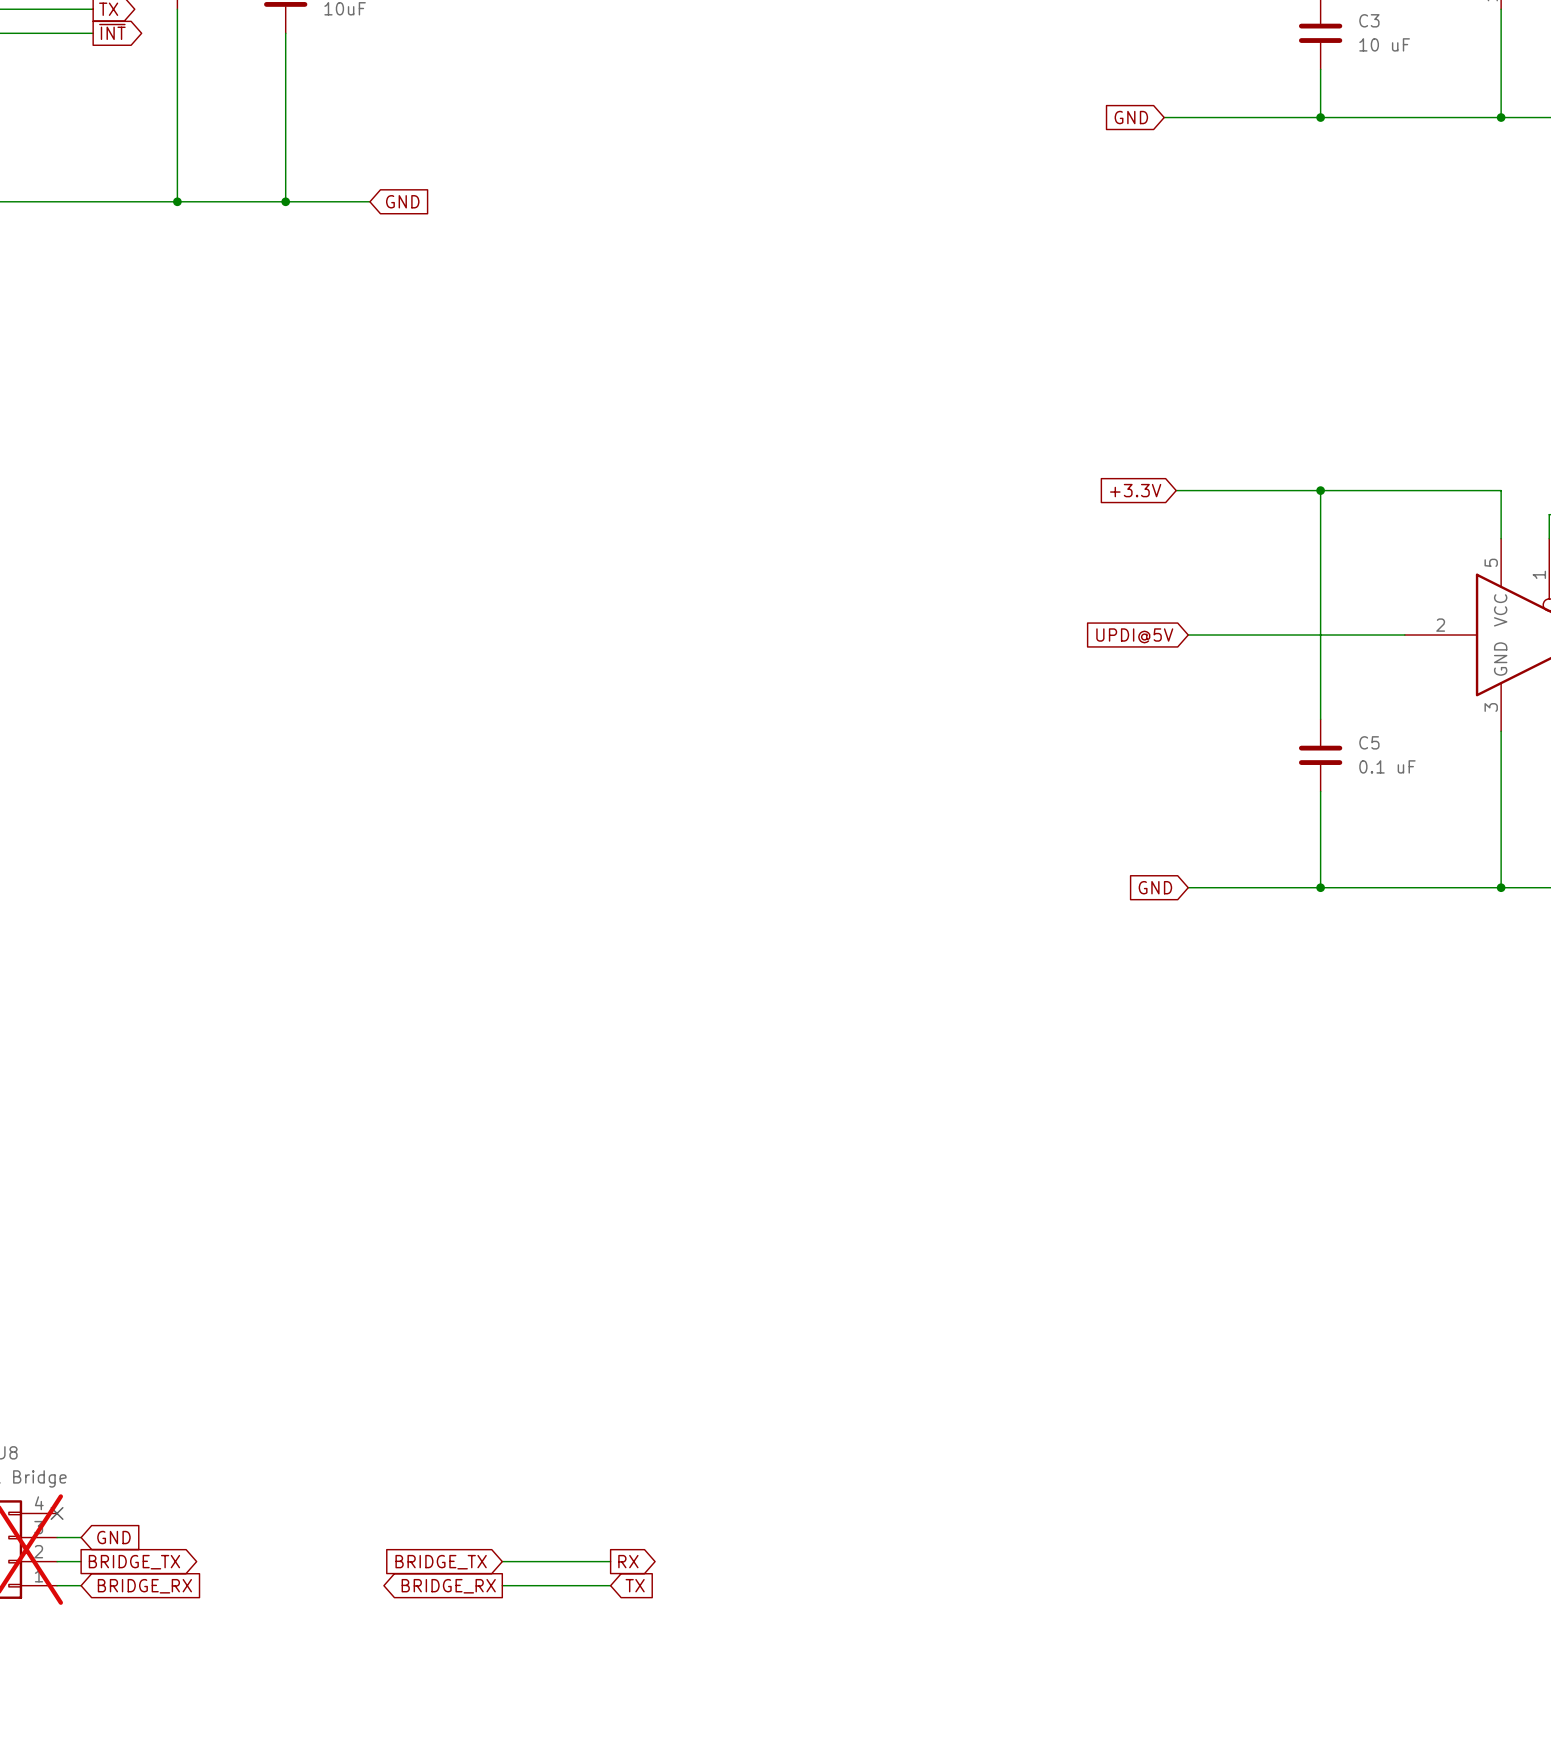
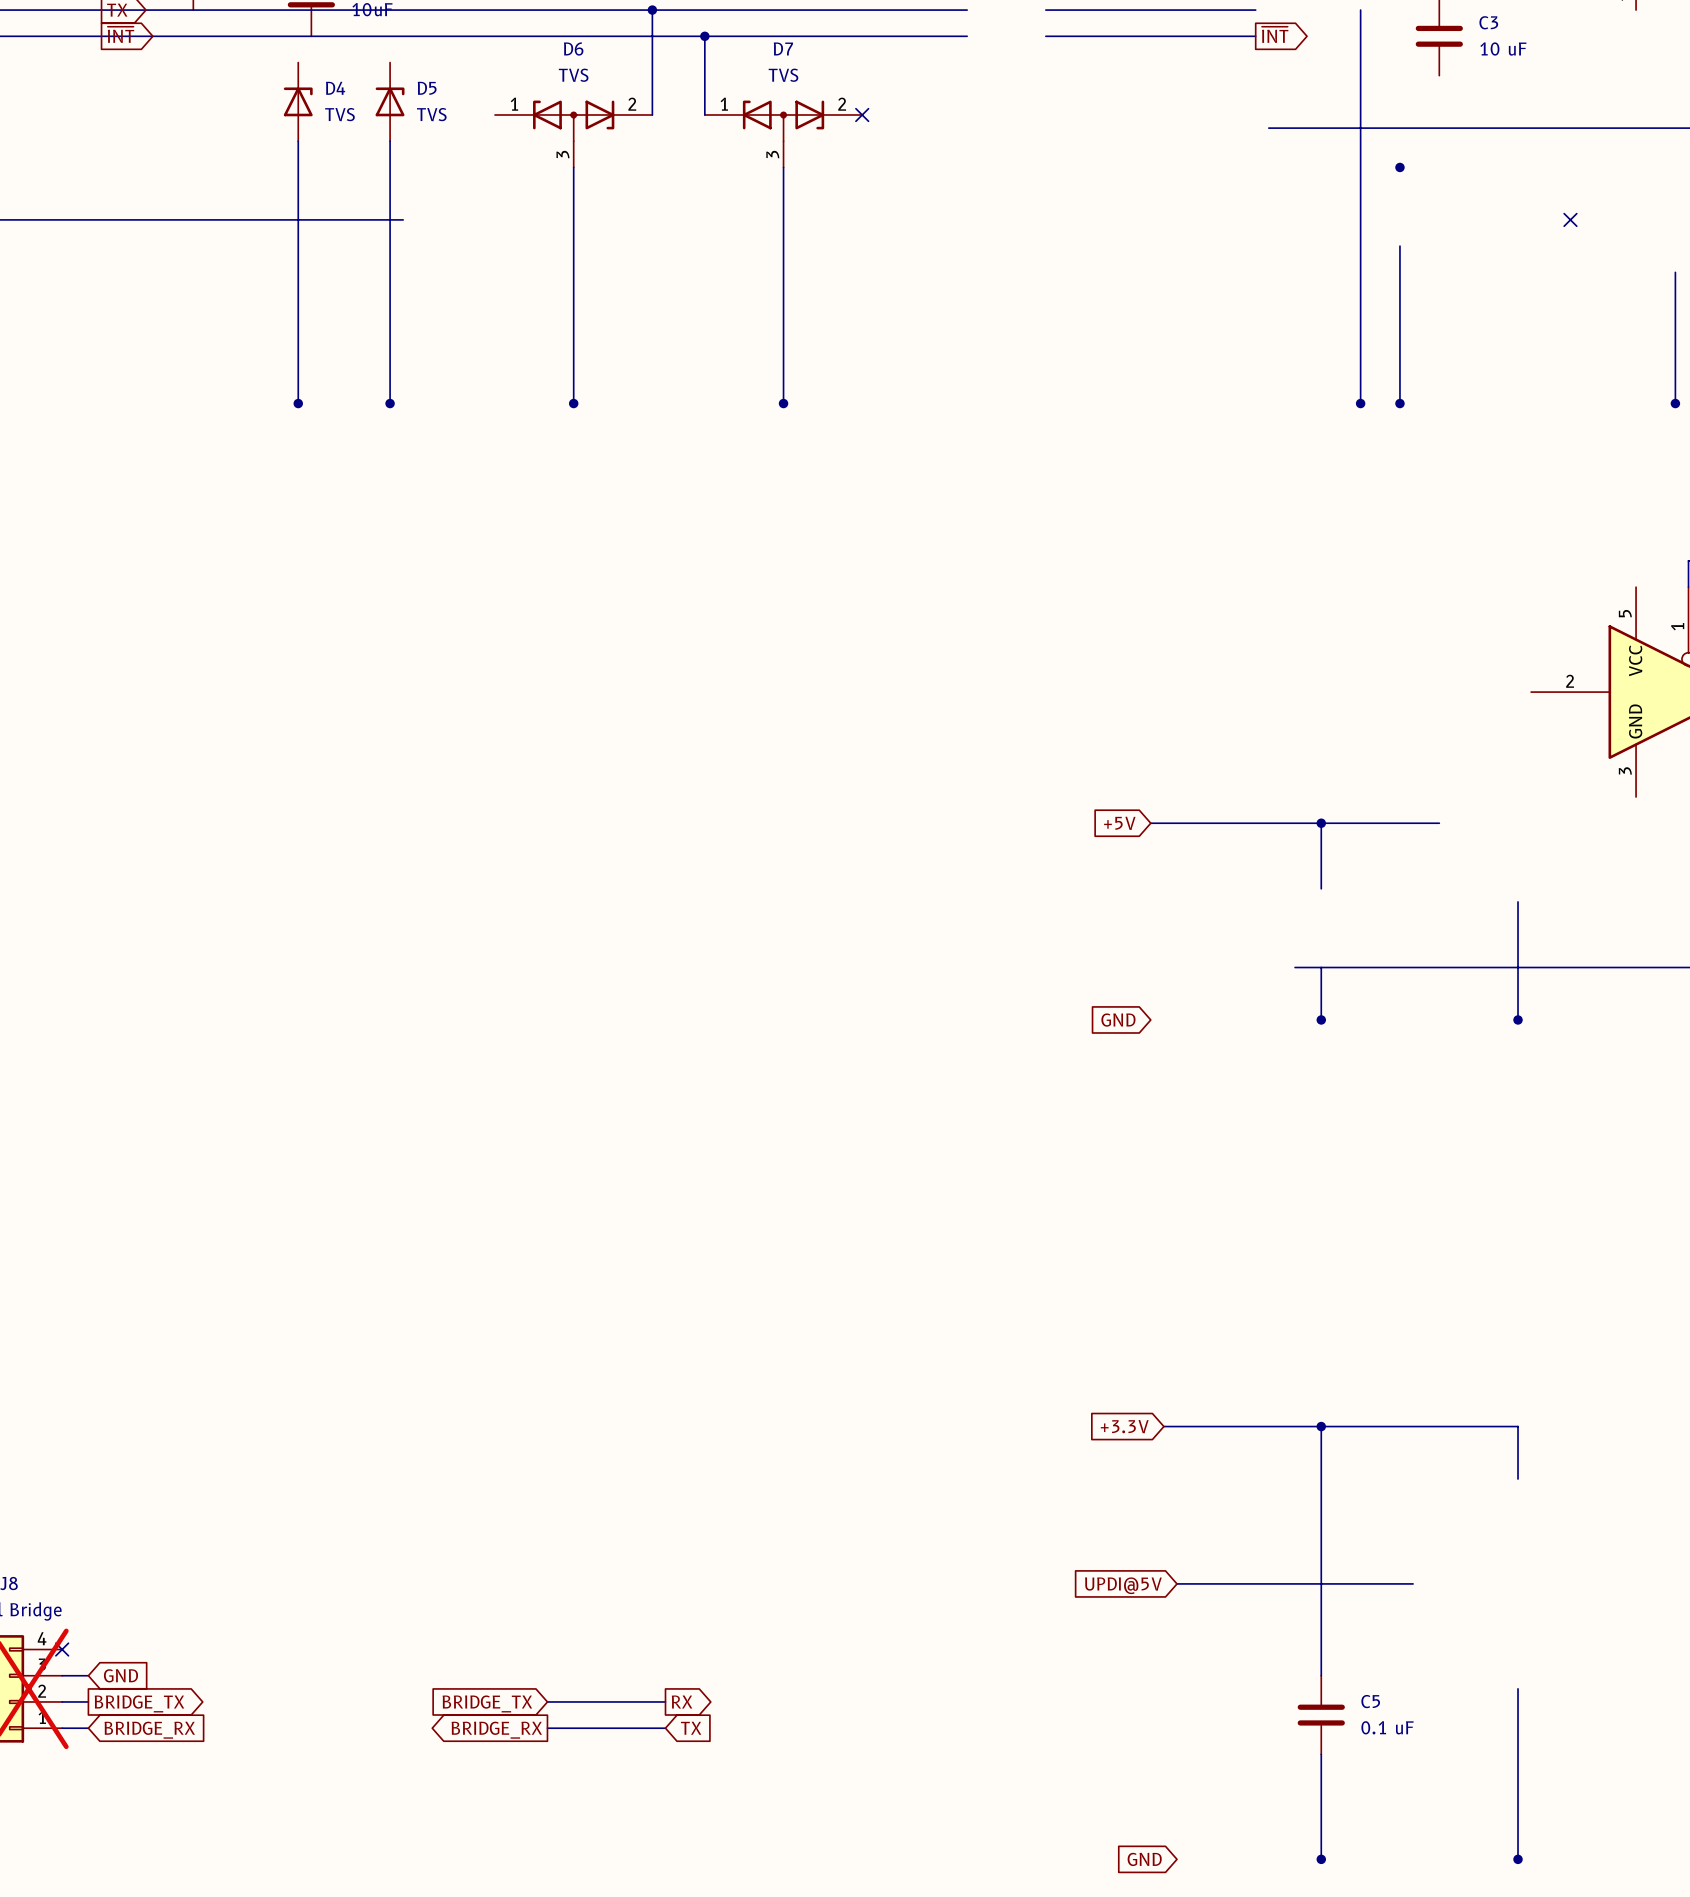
wire: none -> (101, 10) (967, 10)
wire: (177, 9) (177, 201) -> none
wire: none -> (652, 10) (652, 114)
junction: none -> (652, 10)
wire: none -> (1045, 10) (1255, 10)
wire: none -> (1360, 10) (1360, 403)
wire: (1501, 9) (1501, 117) -> none
global label: none -> ~{INT} (1275, 34)
wire: none -> (101, 36) (967, 36)
wire: (285, 33) (285, 201) -> none
wire: none -> (704, 36) (704, 114)
junction: none -> (704, 36)
wire: none -> (1045, 36) (1255, 36)
wire: (1320, 69) (1320, 117) -> none
D4: none -> TVS (298, 101)
D5: none -> TVS (390, 101)
no-connect mark: none -> (862, 114)
global label: GND (1131, 117) -> none
junction position: (1320, 117) -> (1399, 167)
junction: (1501, 117) -> none
D6: none -> TVS (573, 134)
D7: none -> TVS (783, 134)
wire: none -> (298, 141) (298, 403)
wire: none -> (390, 141) (390, 403)
wire: none -> (573, 167) (573, 403)
wire: none -> (783, 167) (783, 403)
junction: (177, 201) -> none
junction: (285, 201) -> none
global label: GND (402, 201) -> none
no-connect mark: none -> (1570, 219)
wire: none -> (1399, 246) (1399, 403)
wire: none -> (1675, 272) (1675, 403)
junction: none -> (298, 403)
junction: none -> (390, 403)
junction: none -> (573, 403)
junction: none -> (783, 403)
junction: none -> (1360, 403)
junction: none -> (1399, 403)
junction: none -> (1675, 403)
global label: +3.3V (1135, 490) -> none
wire: (1176, 490) (1501, 490) (1501, 538) -> none
wire: (1320, 490) (1320, 719) -> none
junction: (1320, 490) -> none
global label: UPDI@5V (1134, 635) -> none
wire: (1188, 635) (1404, 635) -> none
wire: (1501, 731) (1501, 887) -> none
global label: none -> +5V (1119, 823)
wire: none -> (1150, 823) (1439, 823)
wire: none -> (1321, 823) (1321, 888)
junction: none -> (1321, 823)
C5 position: (1320, 755) -> (1321, 1715)
wire: (1320, 791) (1320, 887) -> none
wire: none -> (1518, 901) (1518, 1019)
global label position: GND (1155, 887) -> GND (1118, 1020)
wire: none -> (1321, 967) (1321, 1019)
junction: (1320, 887) -> none
junction: (1501, 887) -> none
junction: none -> (1321, 1019)
junction: none -> (1518, 1019)
global label: none -> +3.3V (1124, 1426)
wire: none -> (1163, 1426) (1518, 1426) (1518, 1479)
wire: none -> (1321, 1426) (1321, 1675)
junction: none -> (1321, 1426)
wire: none -> (1177, 1583) (1413, 1583)
global label: none -> UPDI@5V (1123, 1585)
wire: none -> (1518, 1688) (1518, 1859)
wire: none -> (1321, 1754) (1321, 1859)
global label: none -> GND (1144, 1859)
junction: none -> (1321, 1859)
junction: none -> (1518, 1859)

